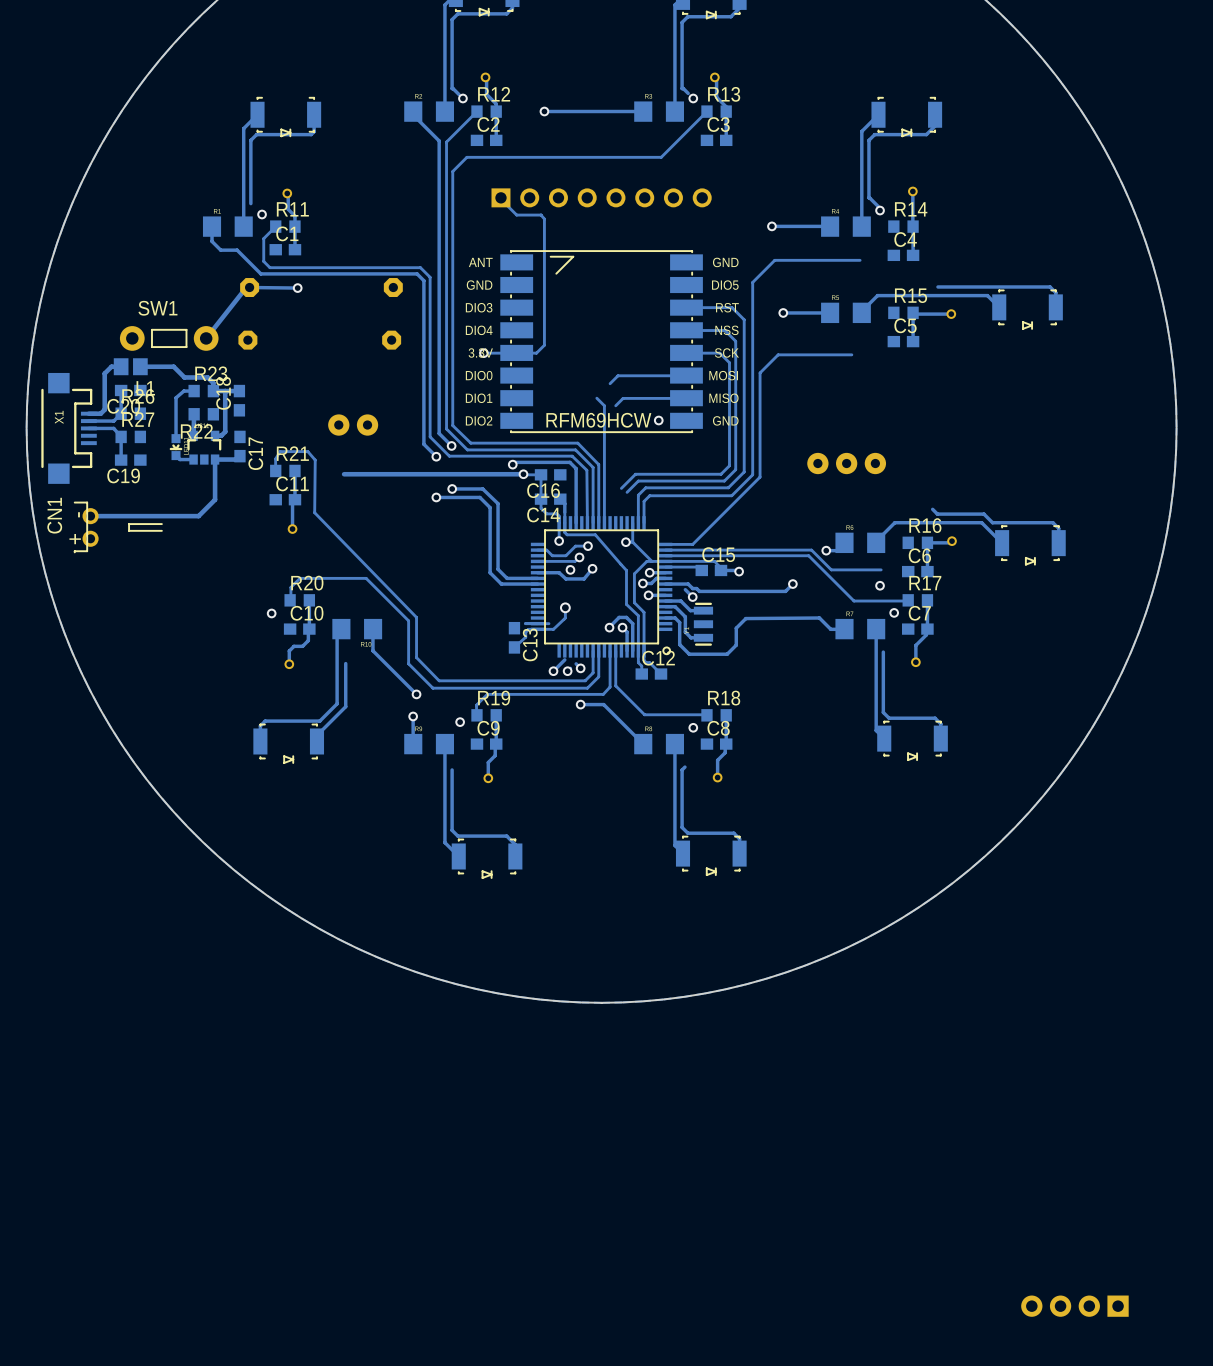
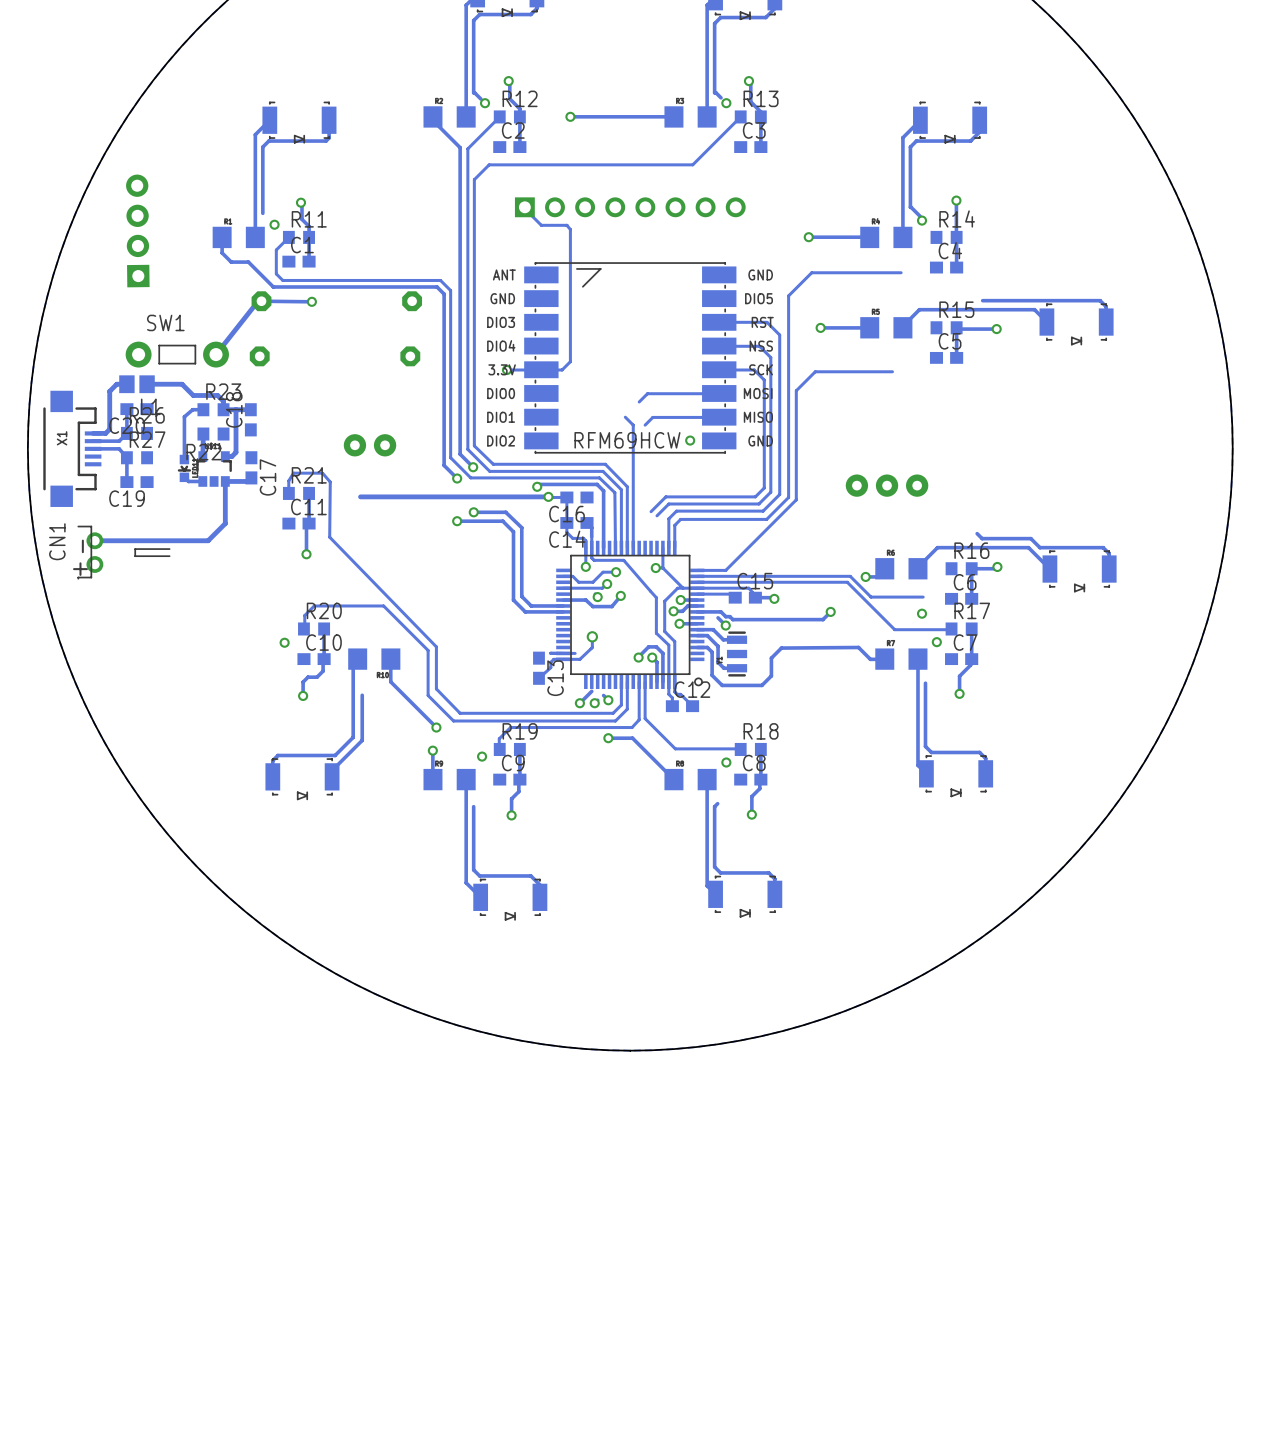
part: none -> (137, 230)
part: (1074, 1306) -> none

